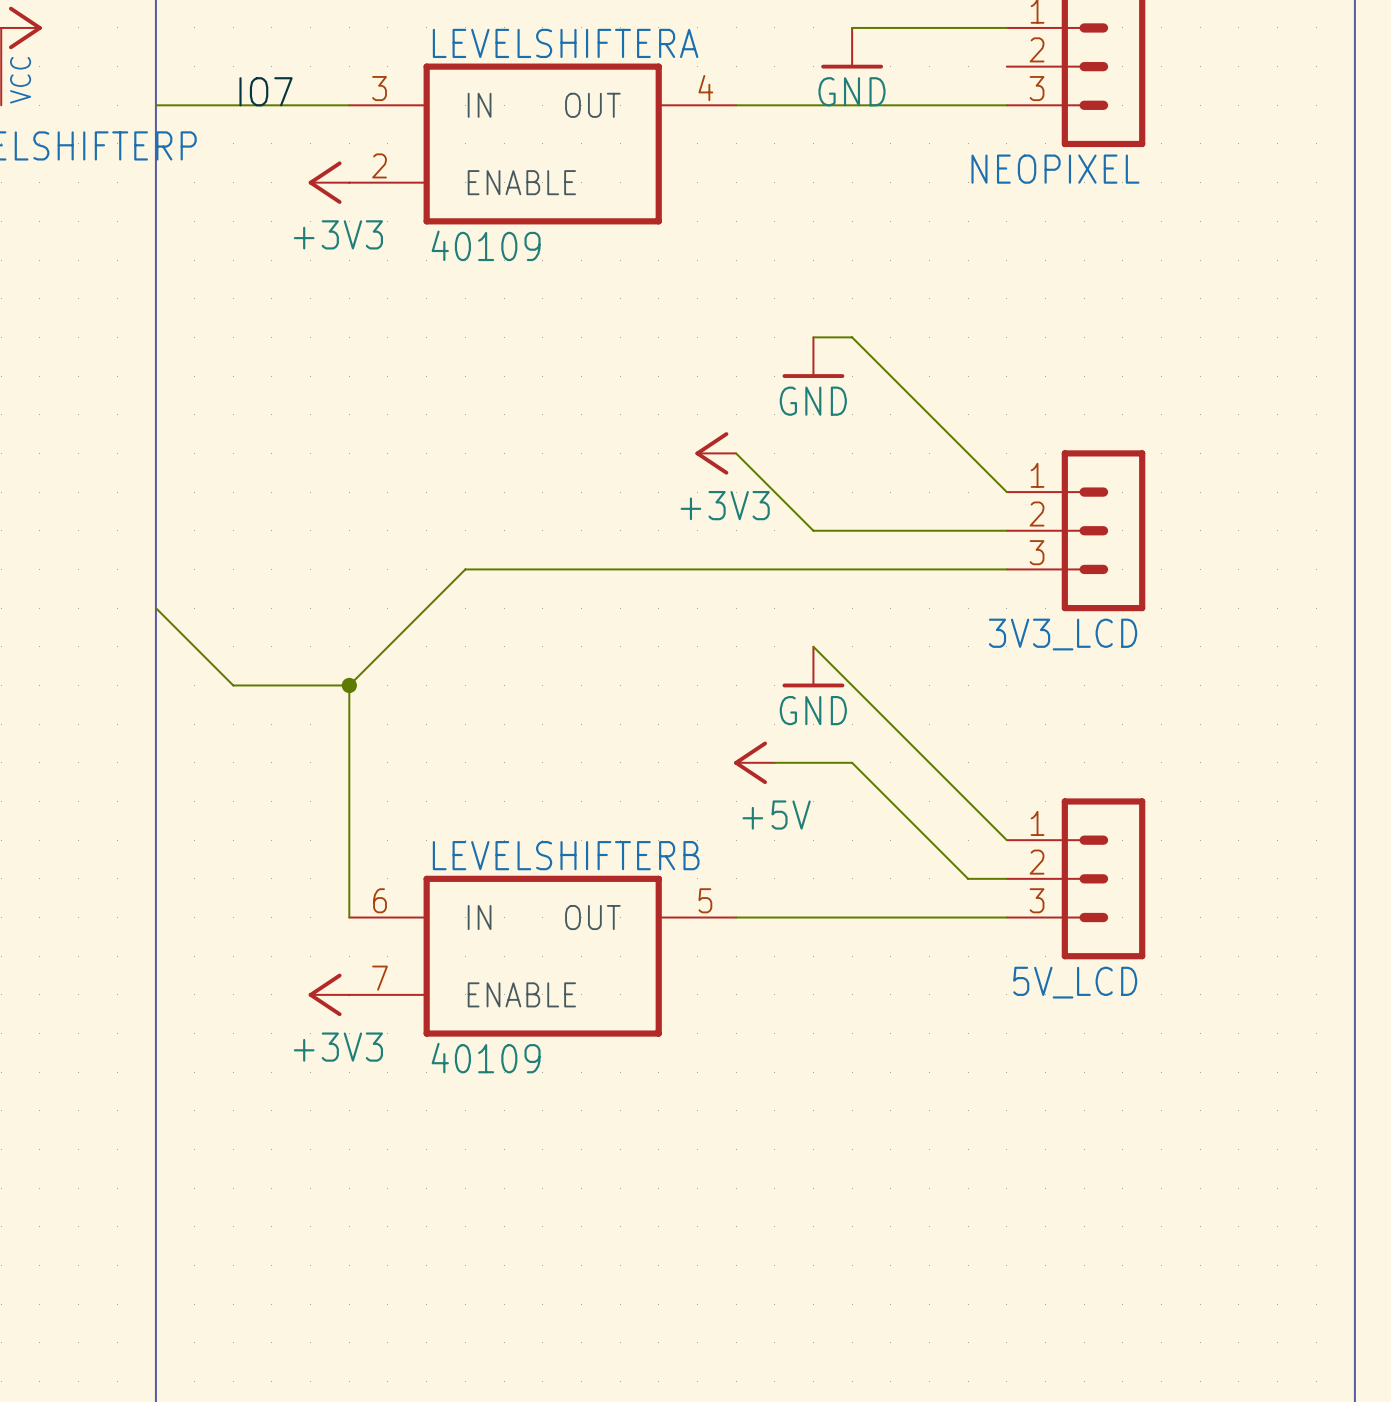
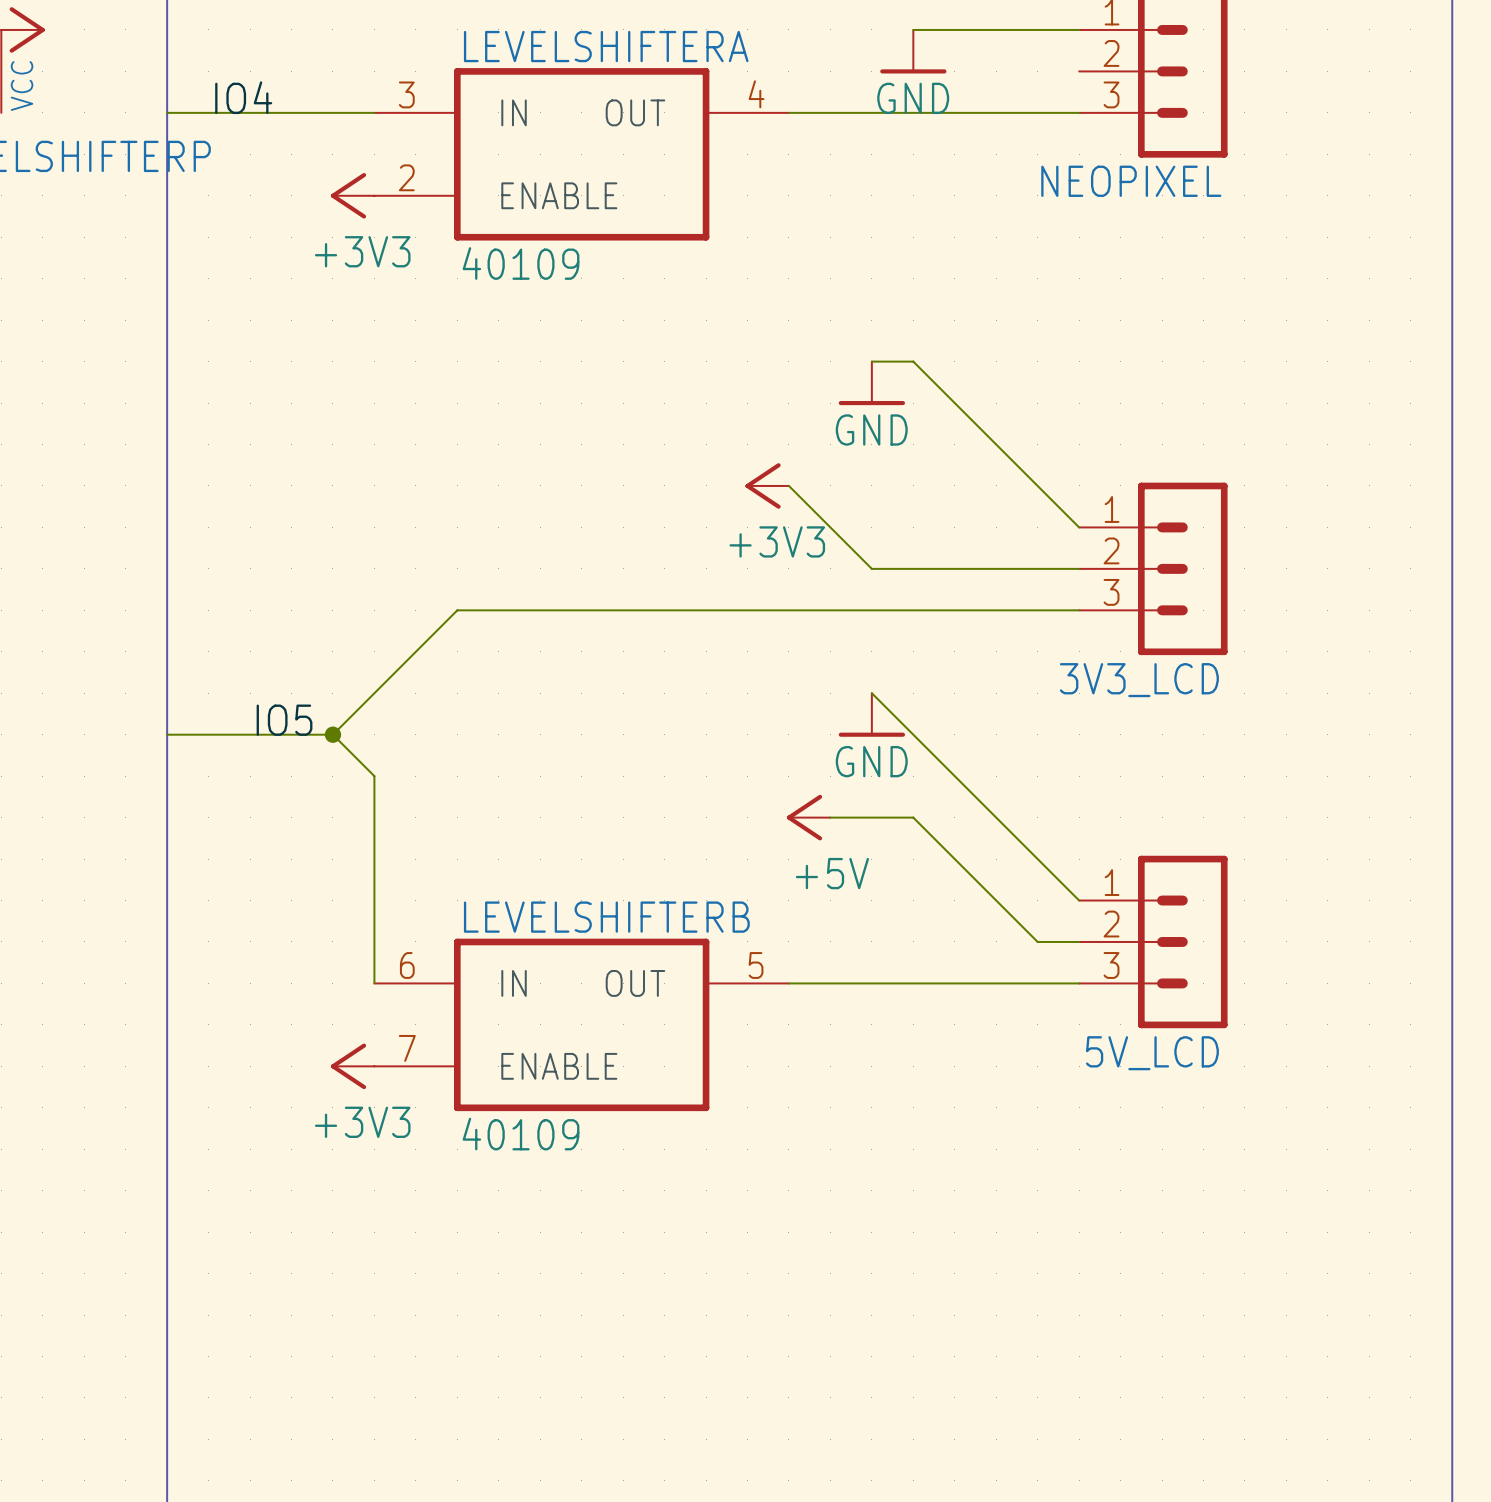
label: IO7 (266, 91) -> IO4 (243, 97)
wire: (465, 569) (349, 685) -> (498, 610) (457, 610) (332, 734) (374, 776)
wire: (155, 608) (233, 685) -> (167, 734) (250, 734)
label: none -> IO5 (284, 720)
wire: (310, 685) (349, 685) -> none
wire: (349, 685) (349, 724) -> none
junction position: (349, 685) -> (332, 734)

